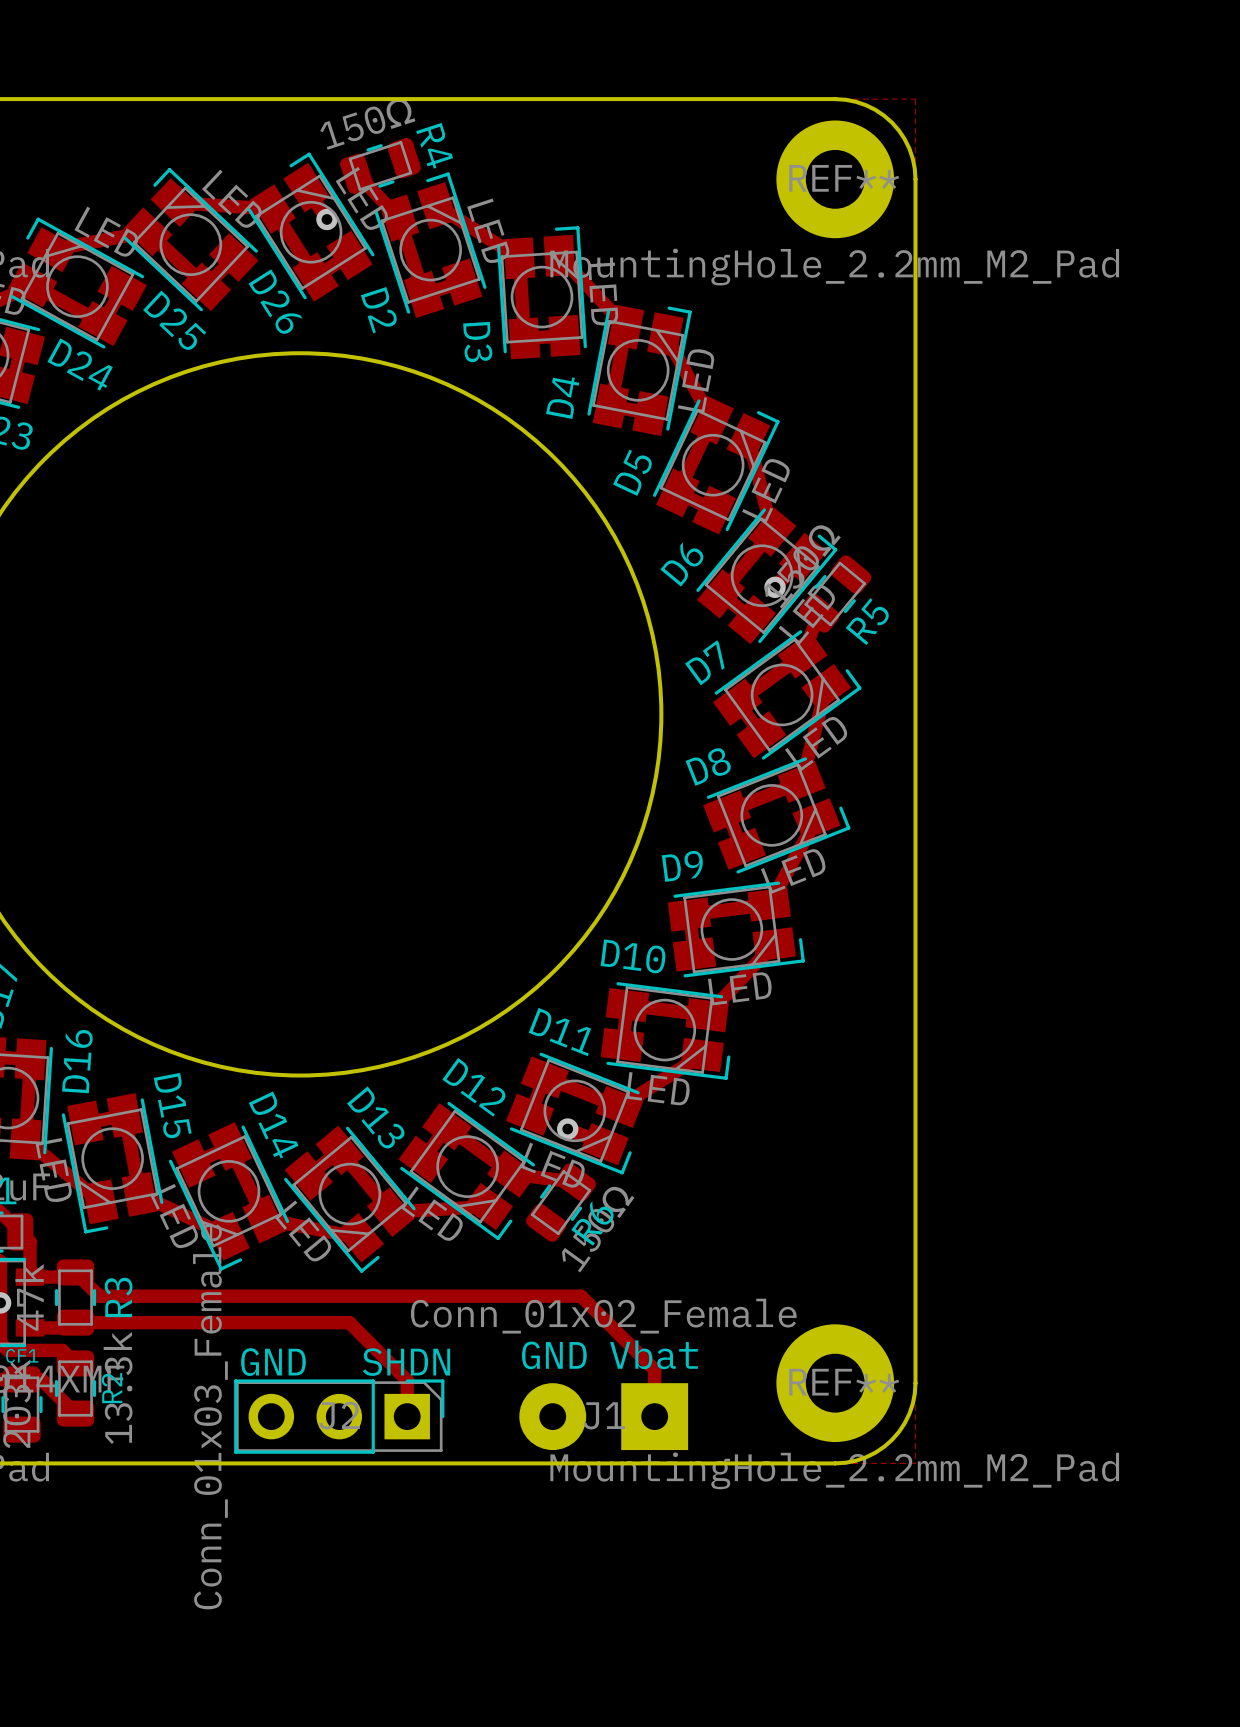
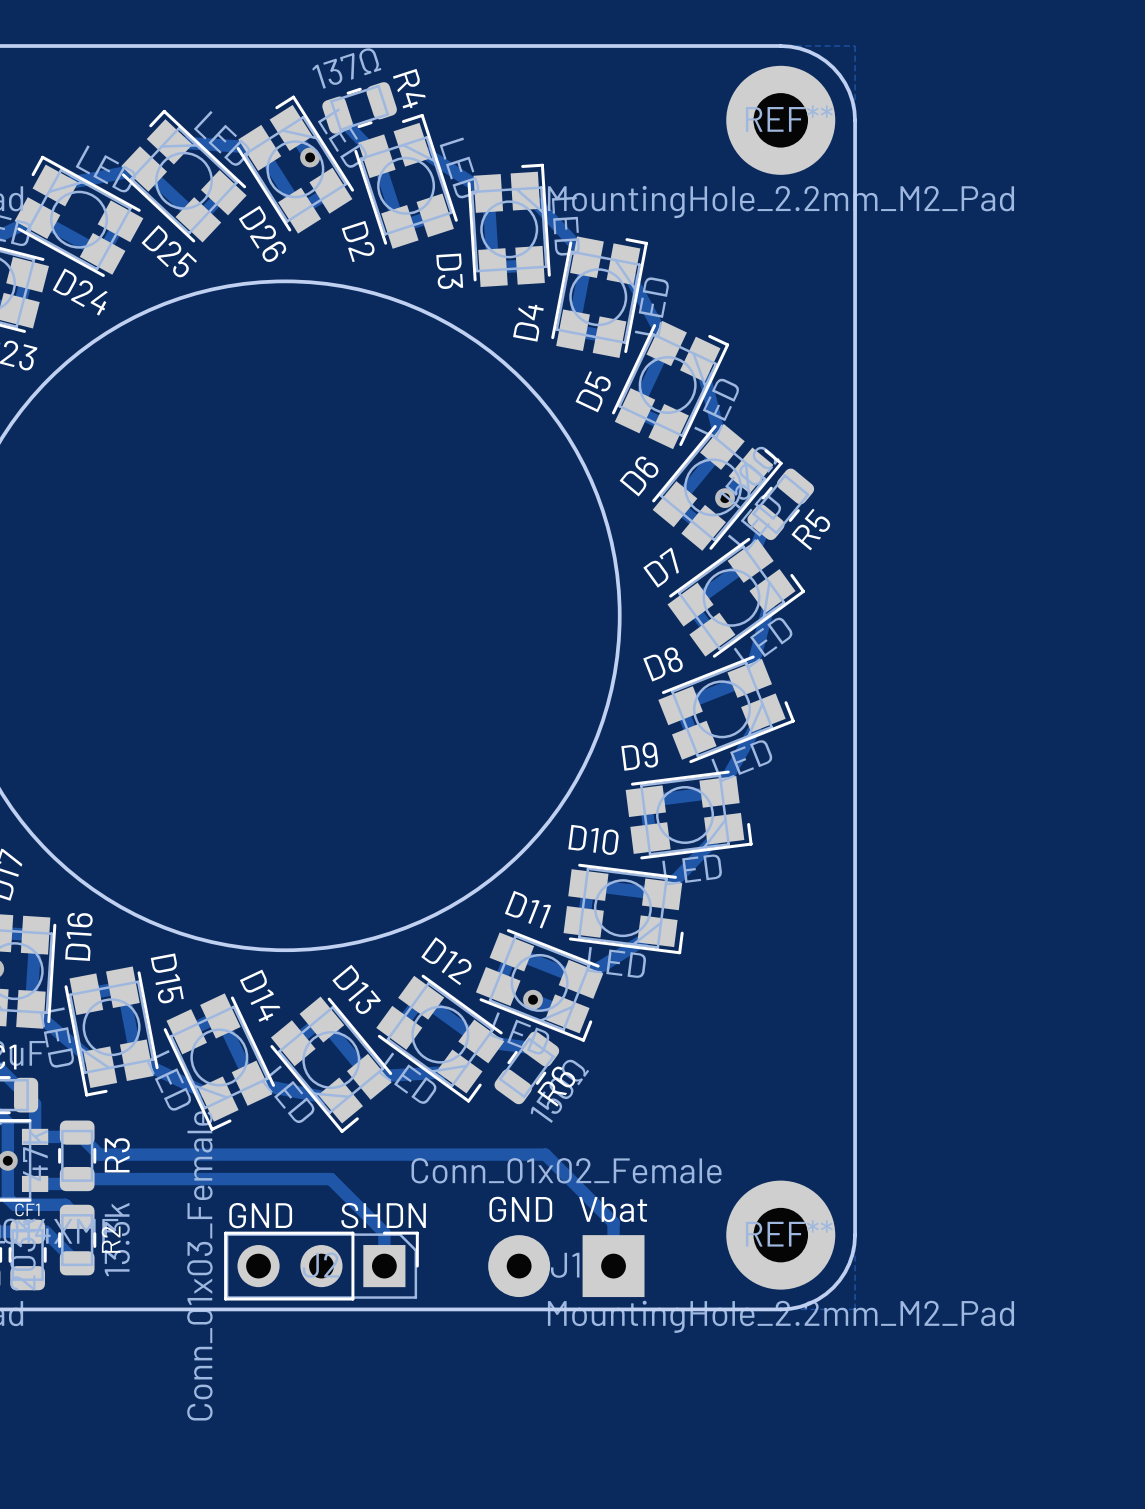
R4 value: 150Ω (367, 123) -> 137Ω (346, 68)

